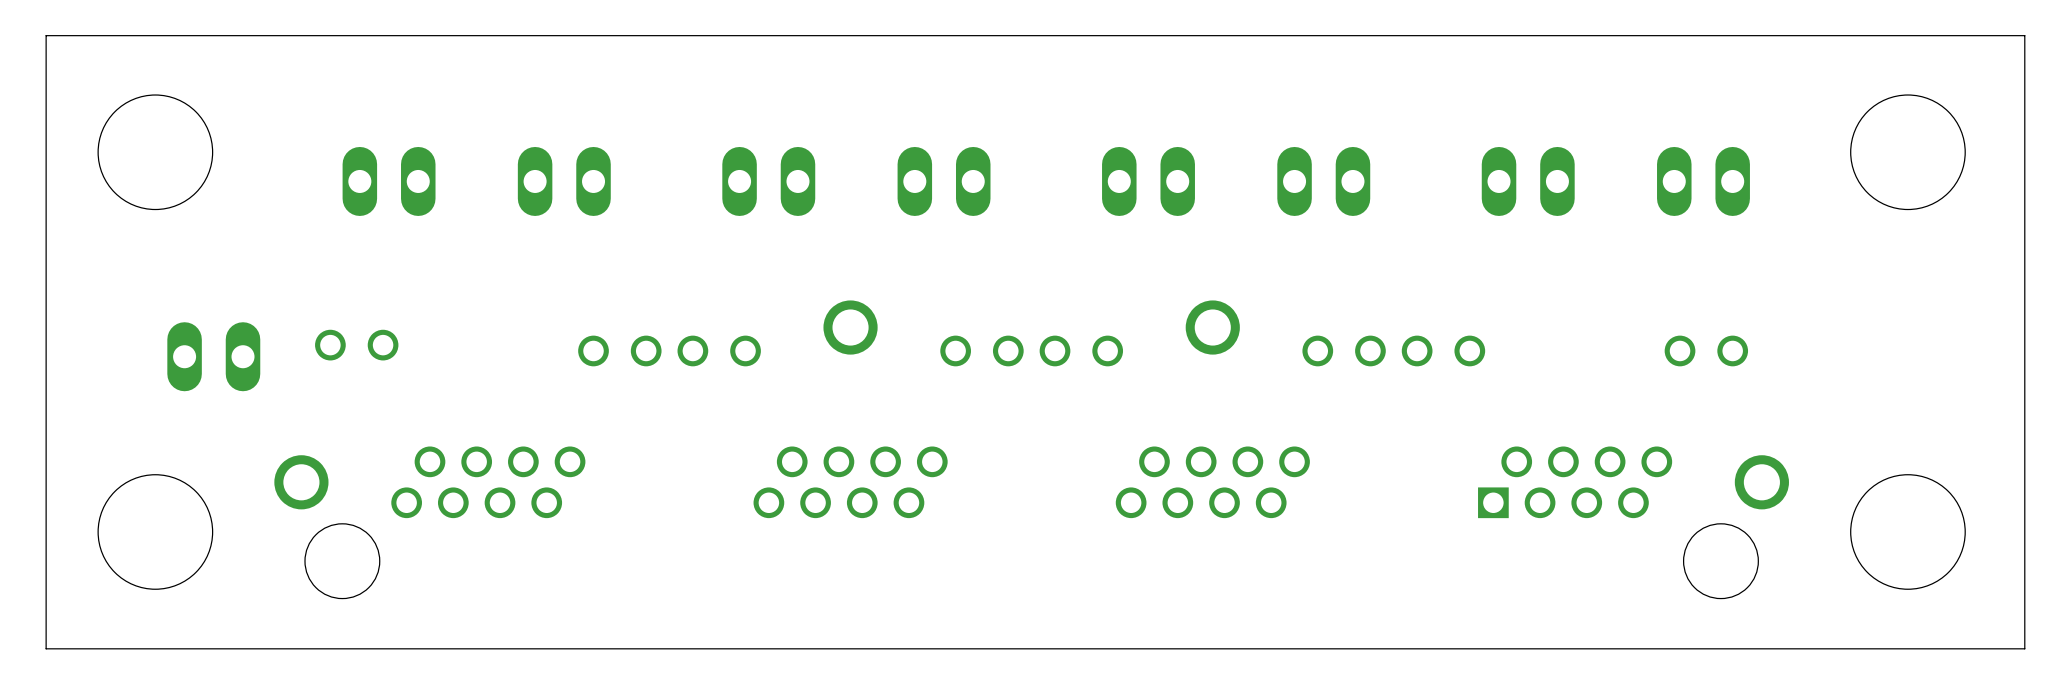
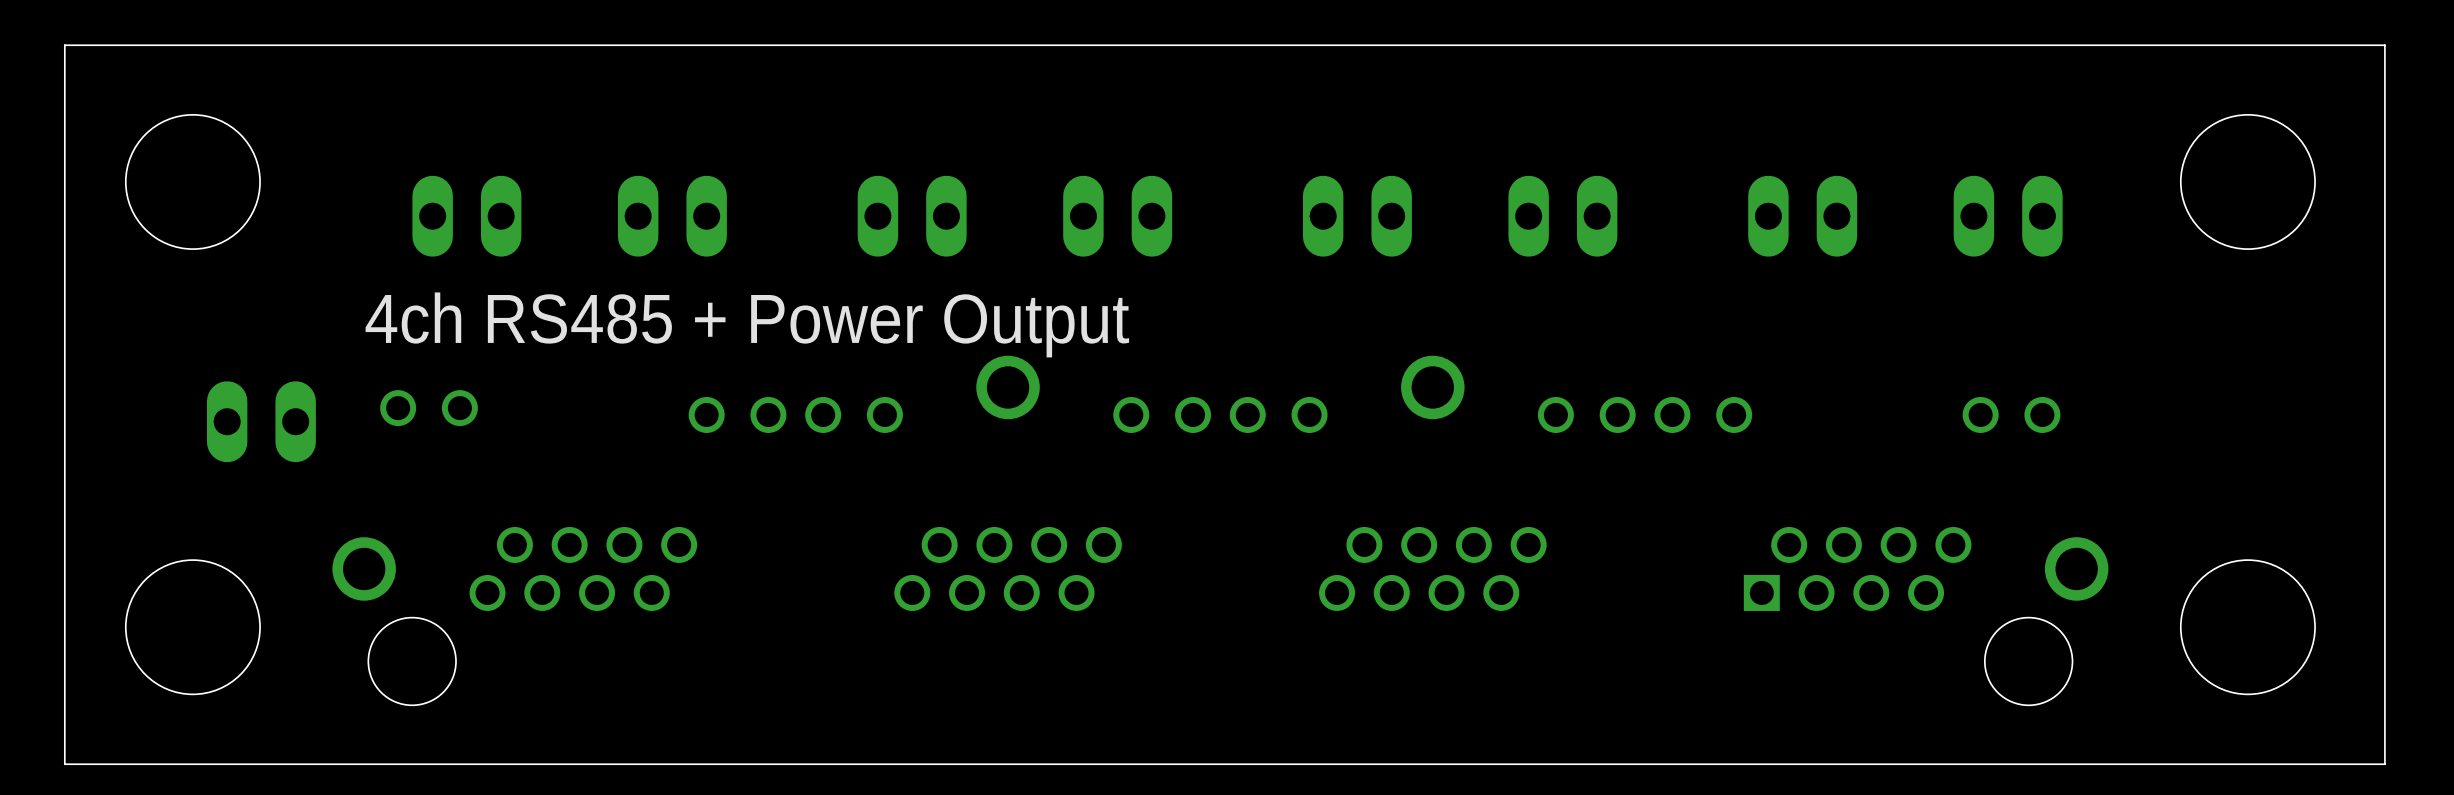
text: none -> 4ch RS485 + Power Output (747, 324)

